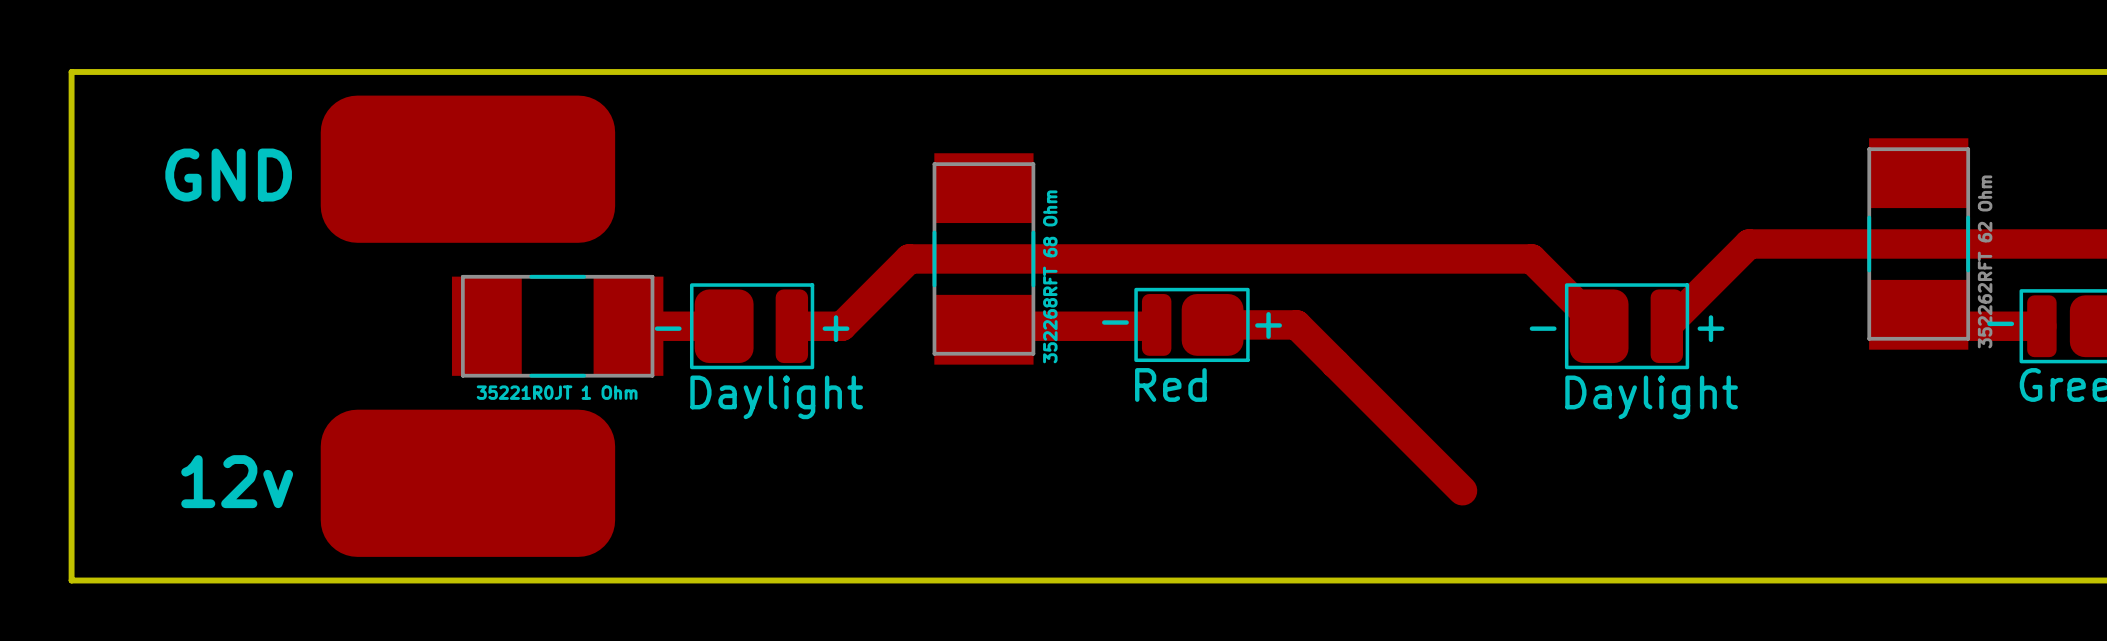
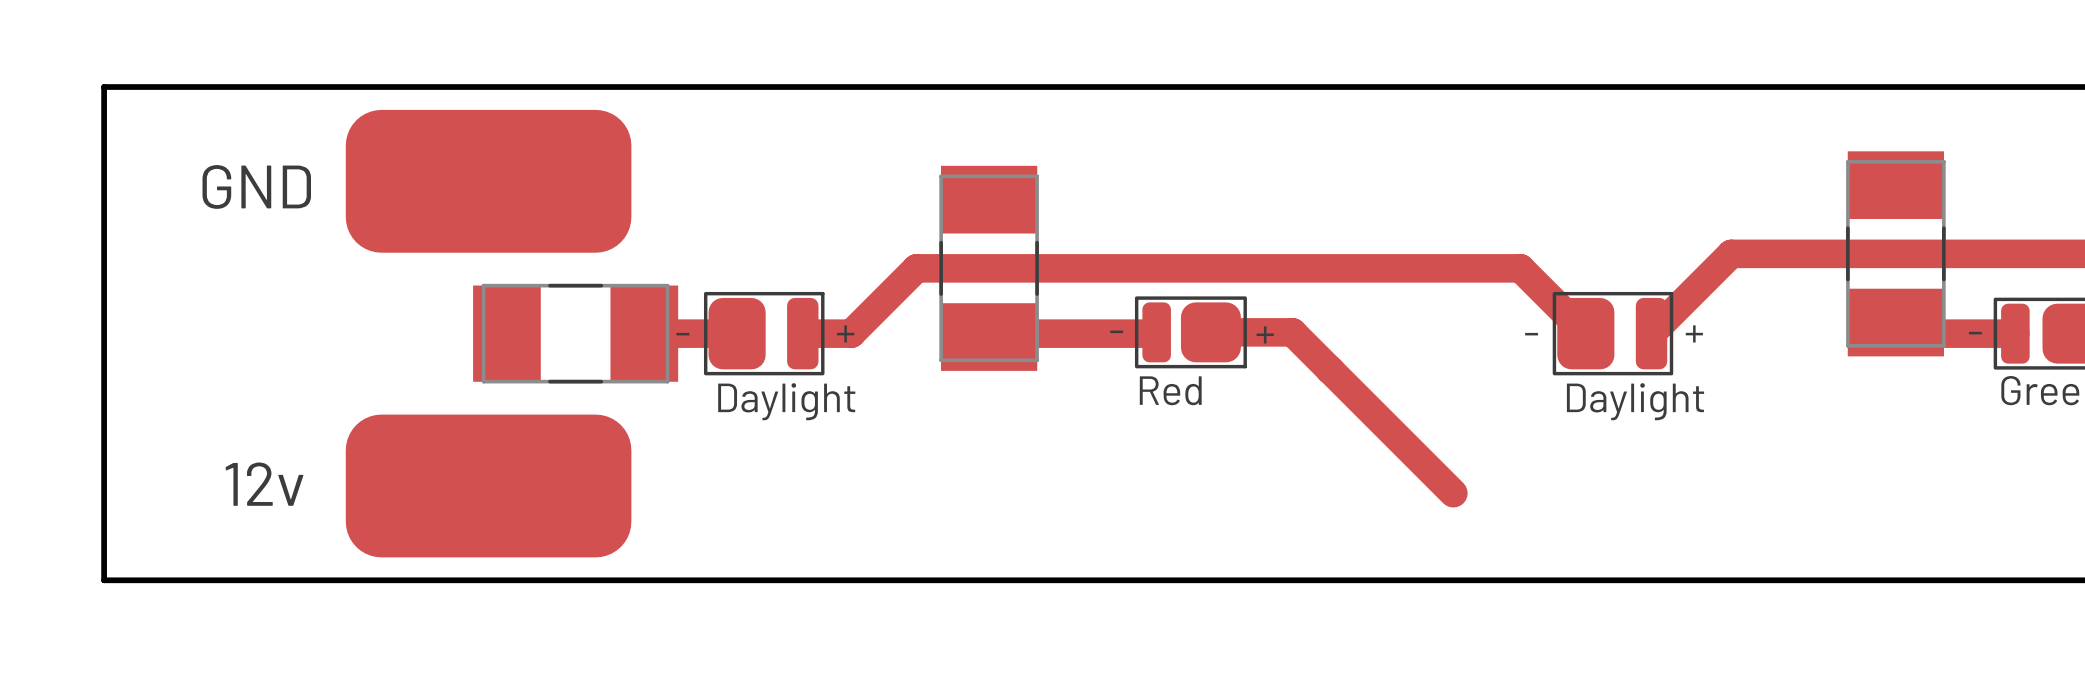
part value: 352262RFT 62 Ohm (1985, 261) -> none
part value: 352268RFT 68 Ohm (1050, 276) -> none
part value: 35221R0JT 1 Ohm (557, 392) -> none

